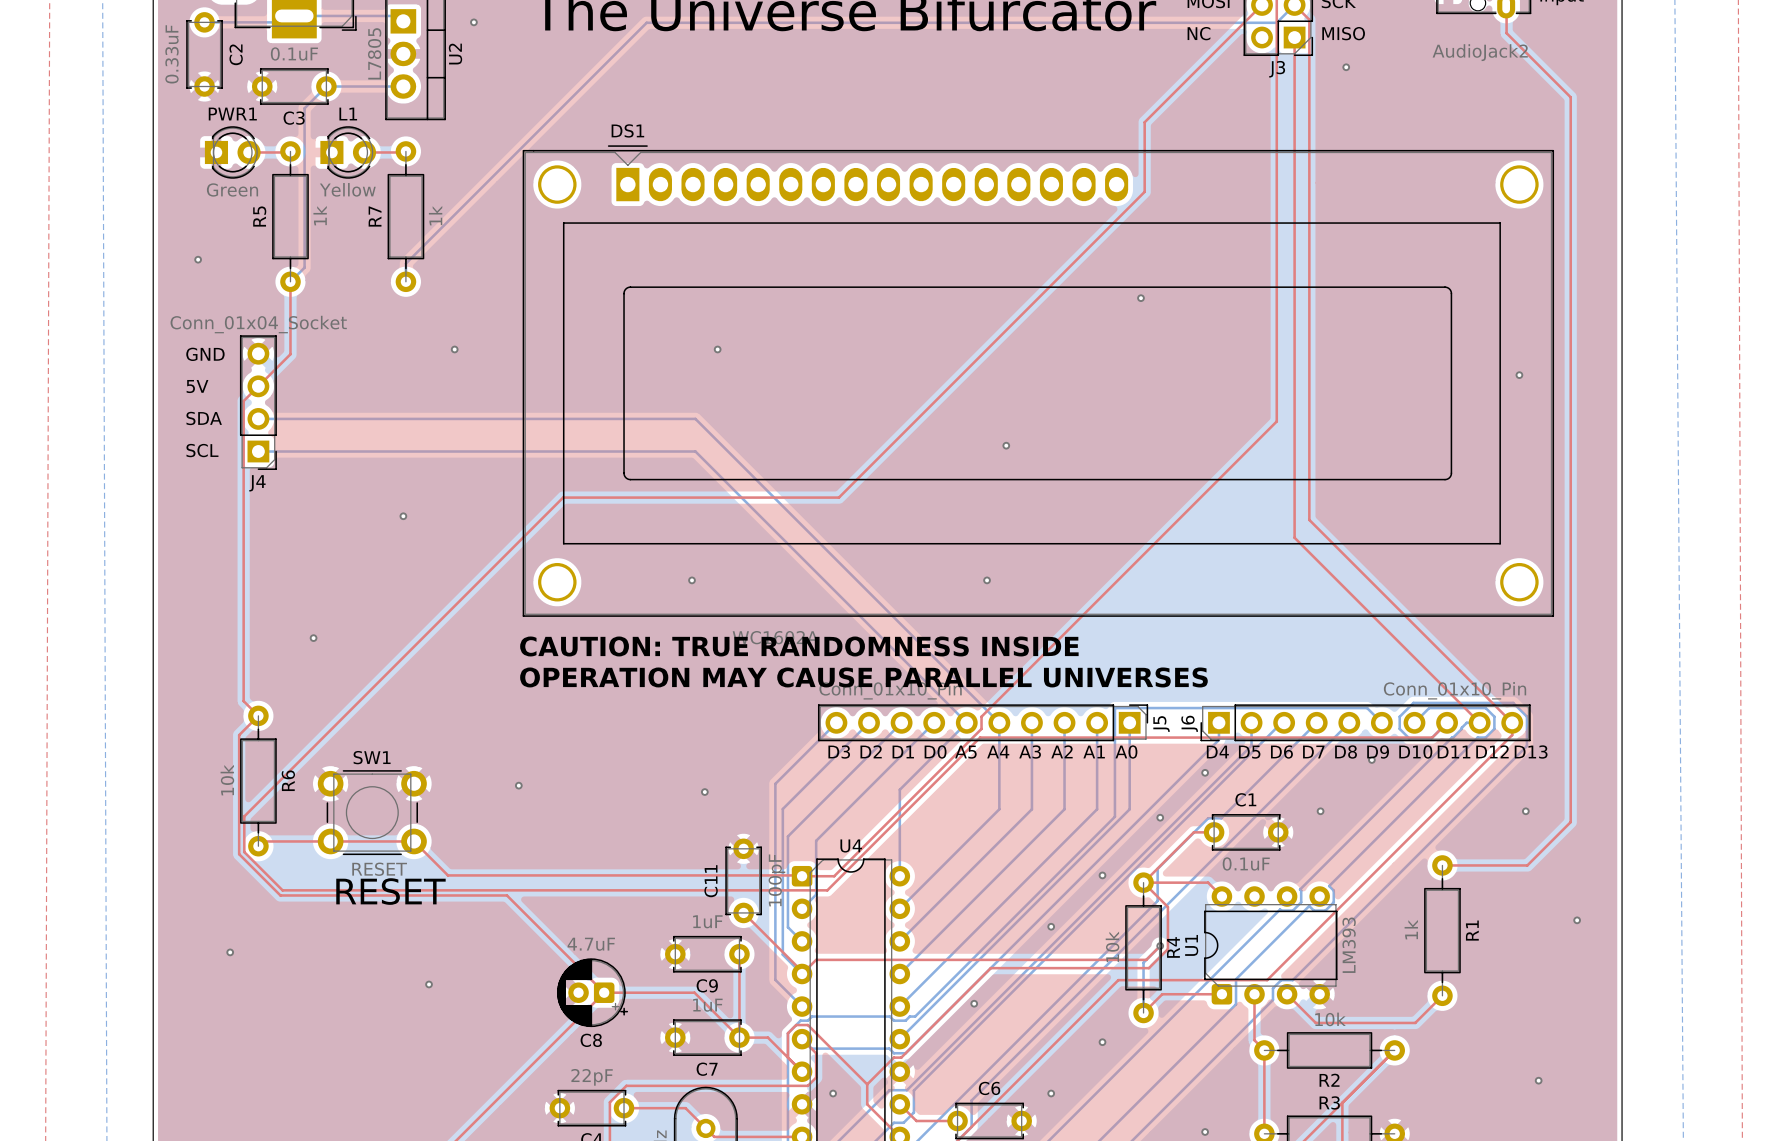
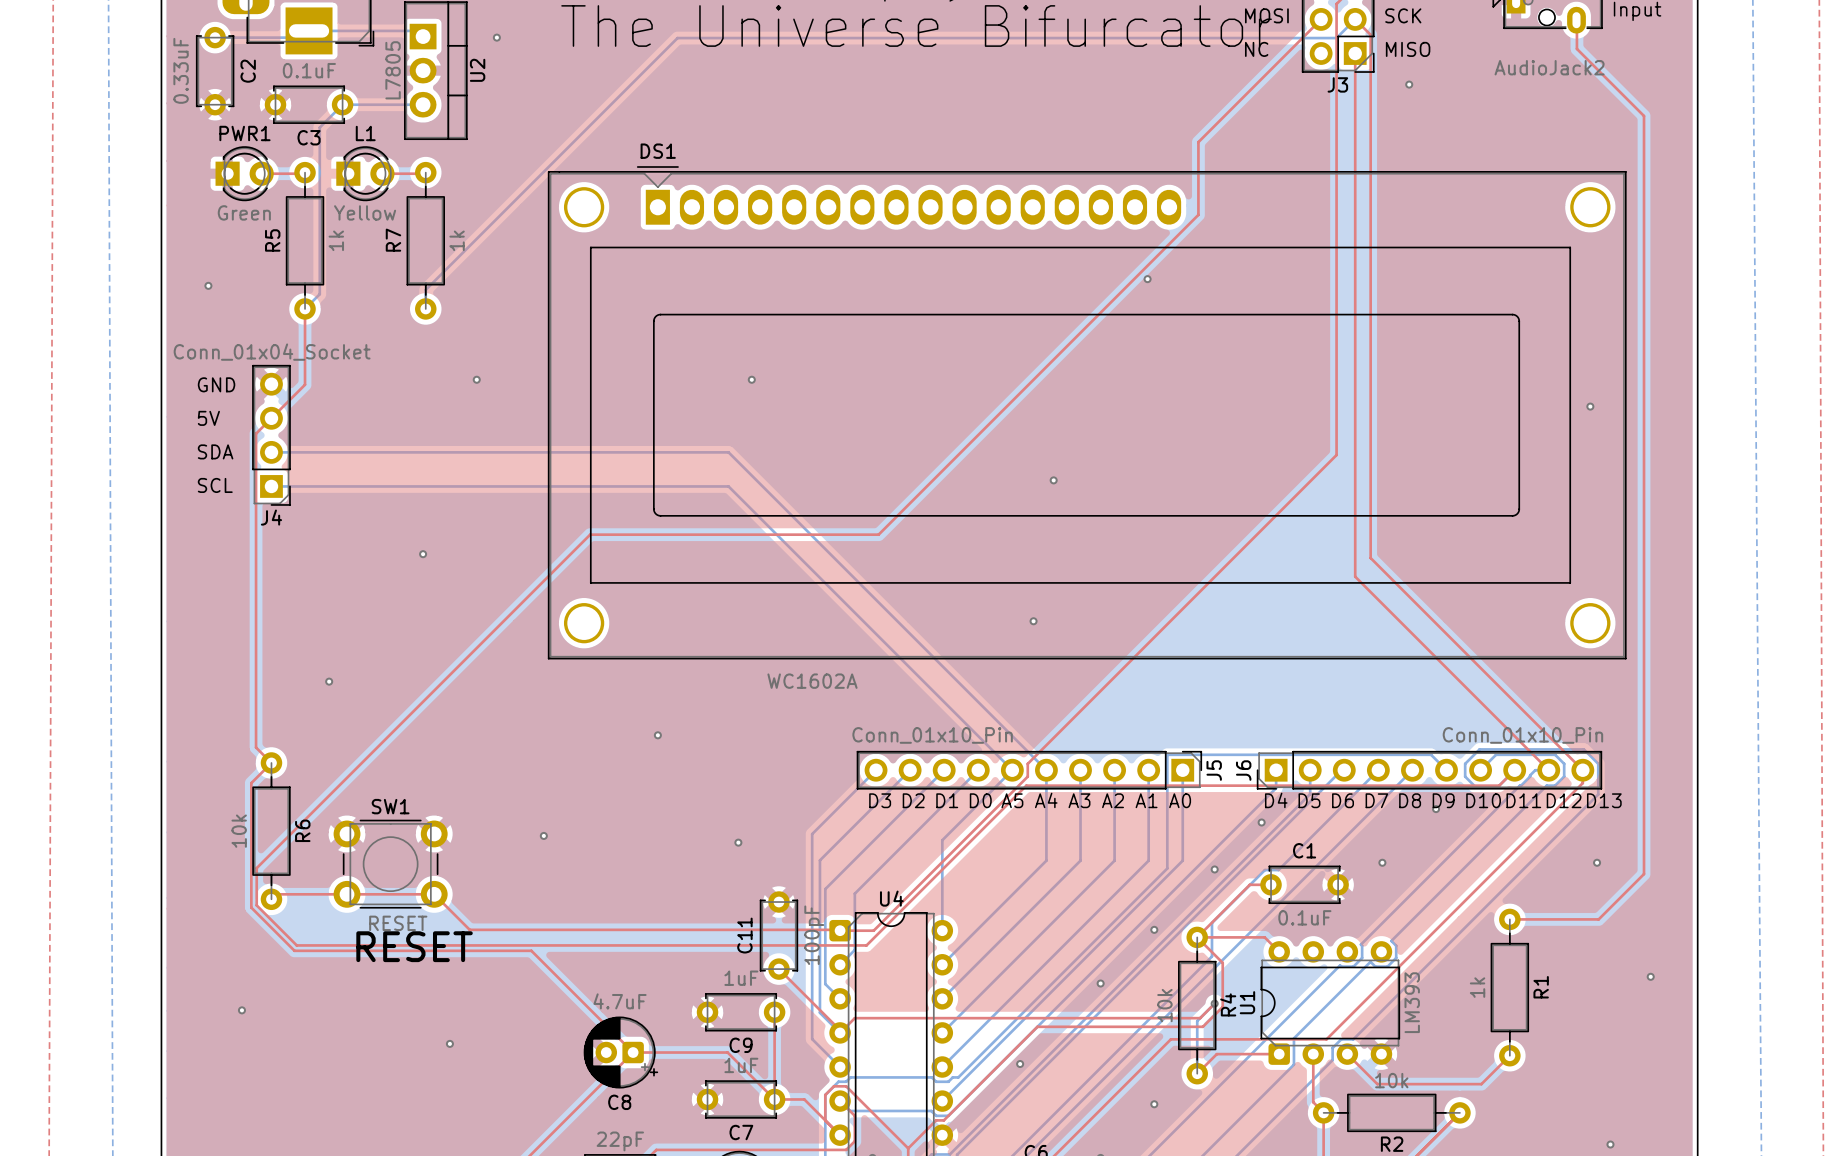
via position: (1140, 298) -> (1147, 279)
via: (692, 580) -> none
text: CAUTION: TRUE RANDOMNESS INSIDE (799, 646) -> none
text: OPERATION MAY CAUSE PARALLEL UNIVERSES (863, 677) -> none
via: none -> (657, 735)

